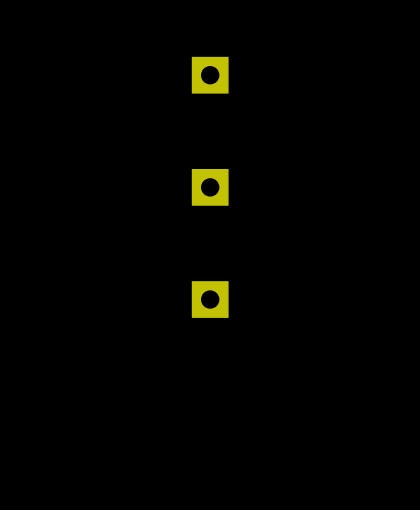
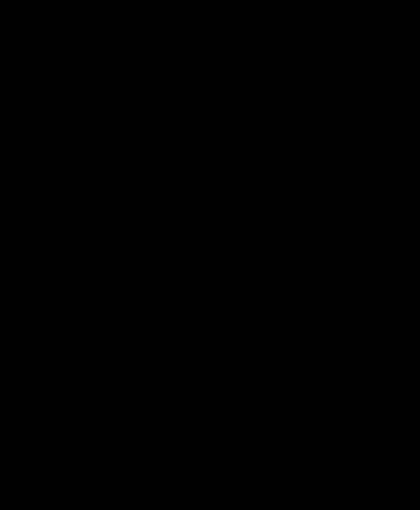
part: (210, 75) -> none
part: (210, 187) -> none
part: (210, 299) -> none

